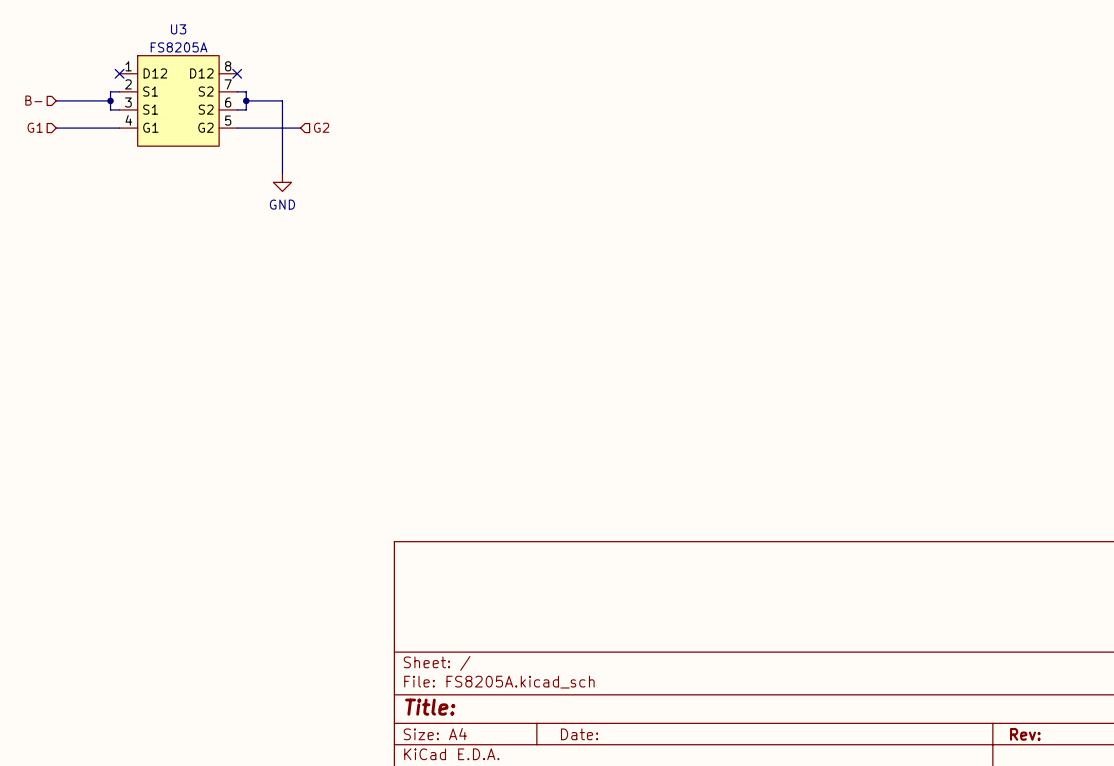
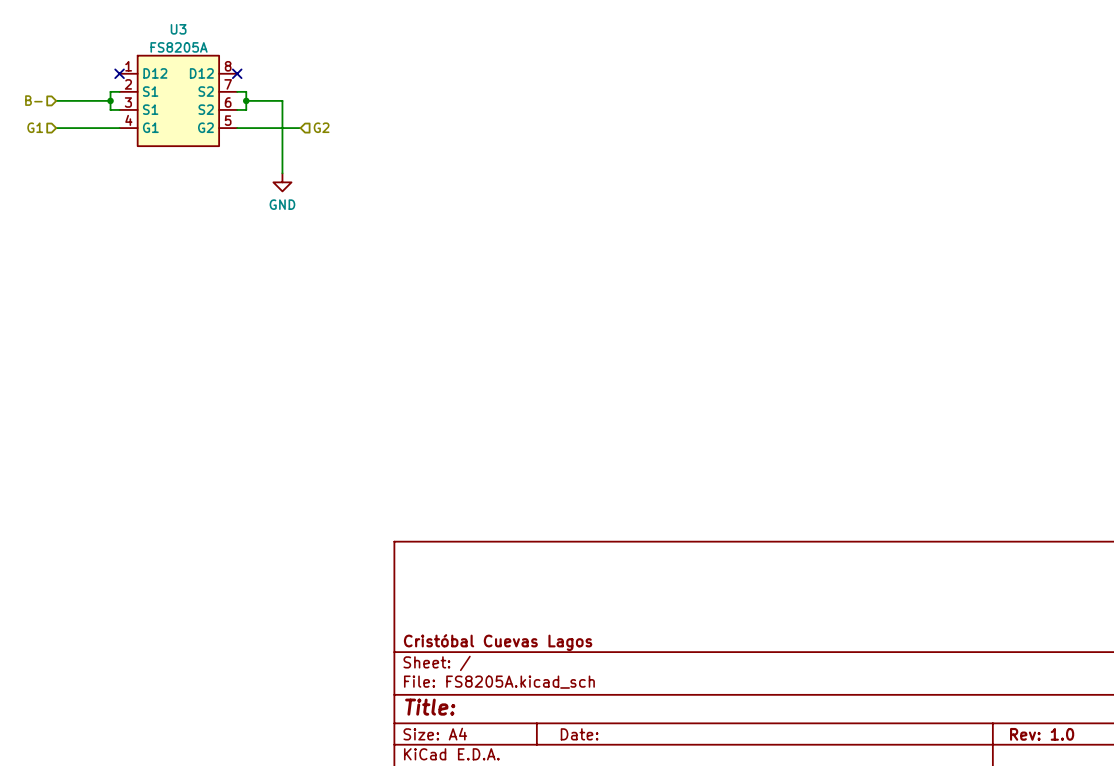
title block: none -> Cristóbal Cuevas Lagos (498, 642)
title block: Rev: (1025, 734) -> Rev: 1.0 (1042, 734)

